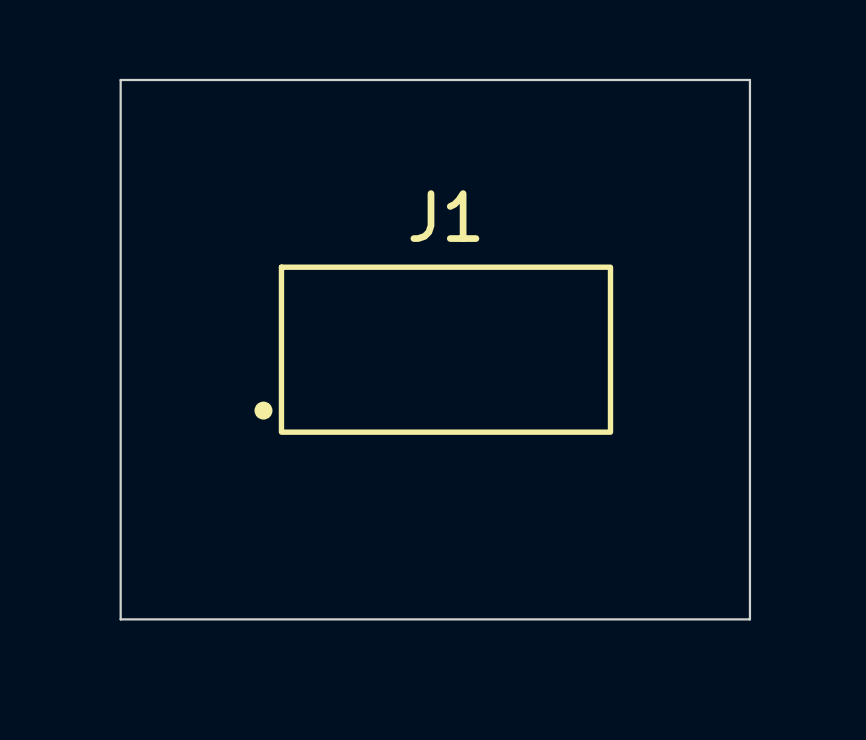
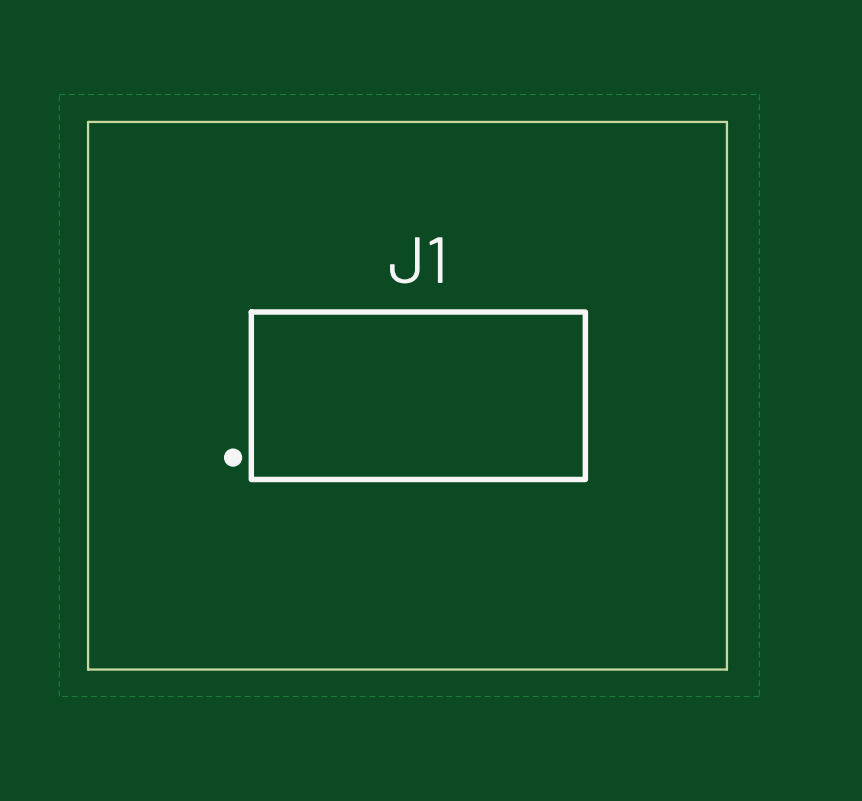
zone outline: none -> (59, 94) (759, 94) (759, 696) (59, 696) (59, 94)

